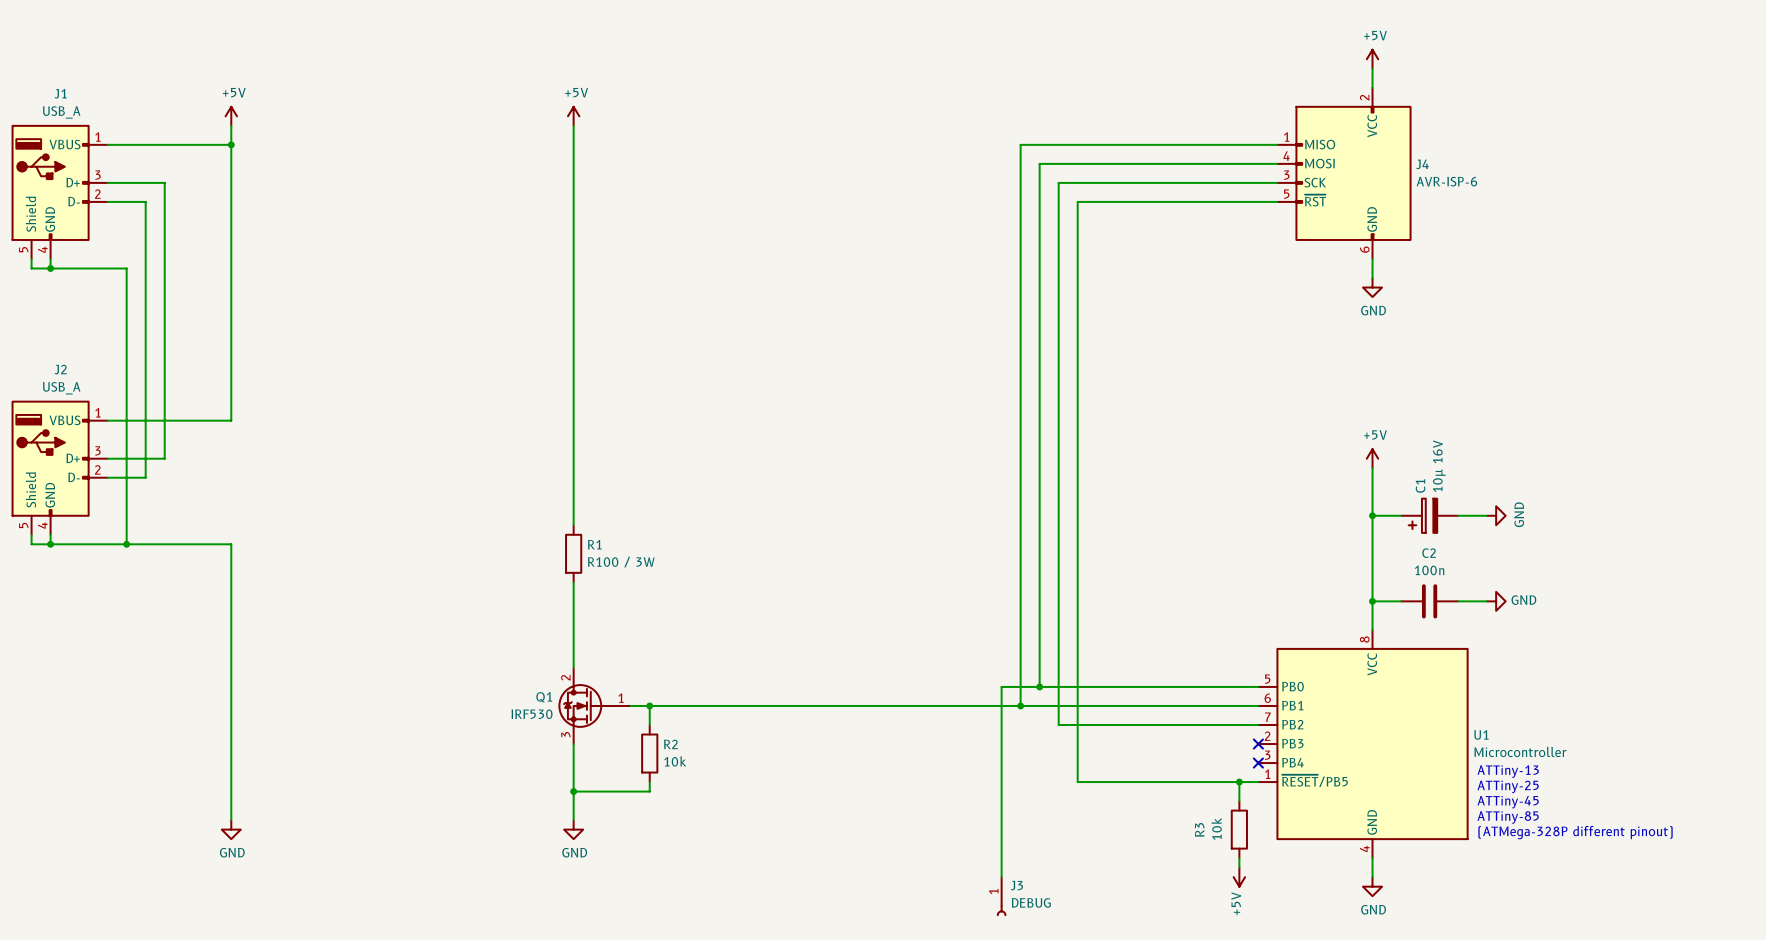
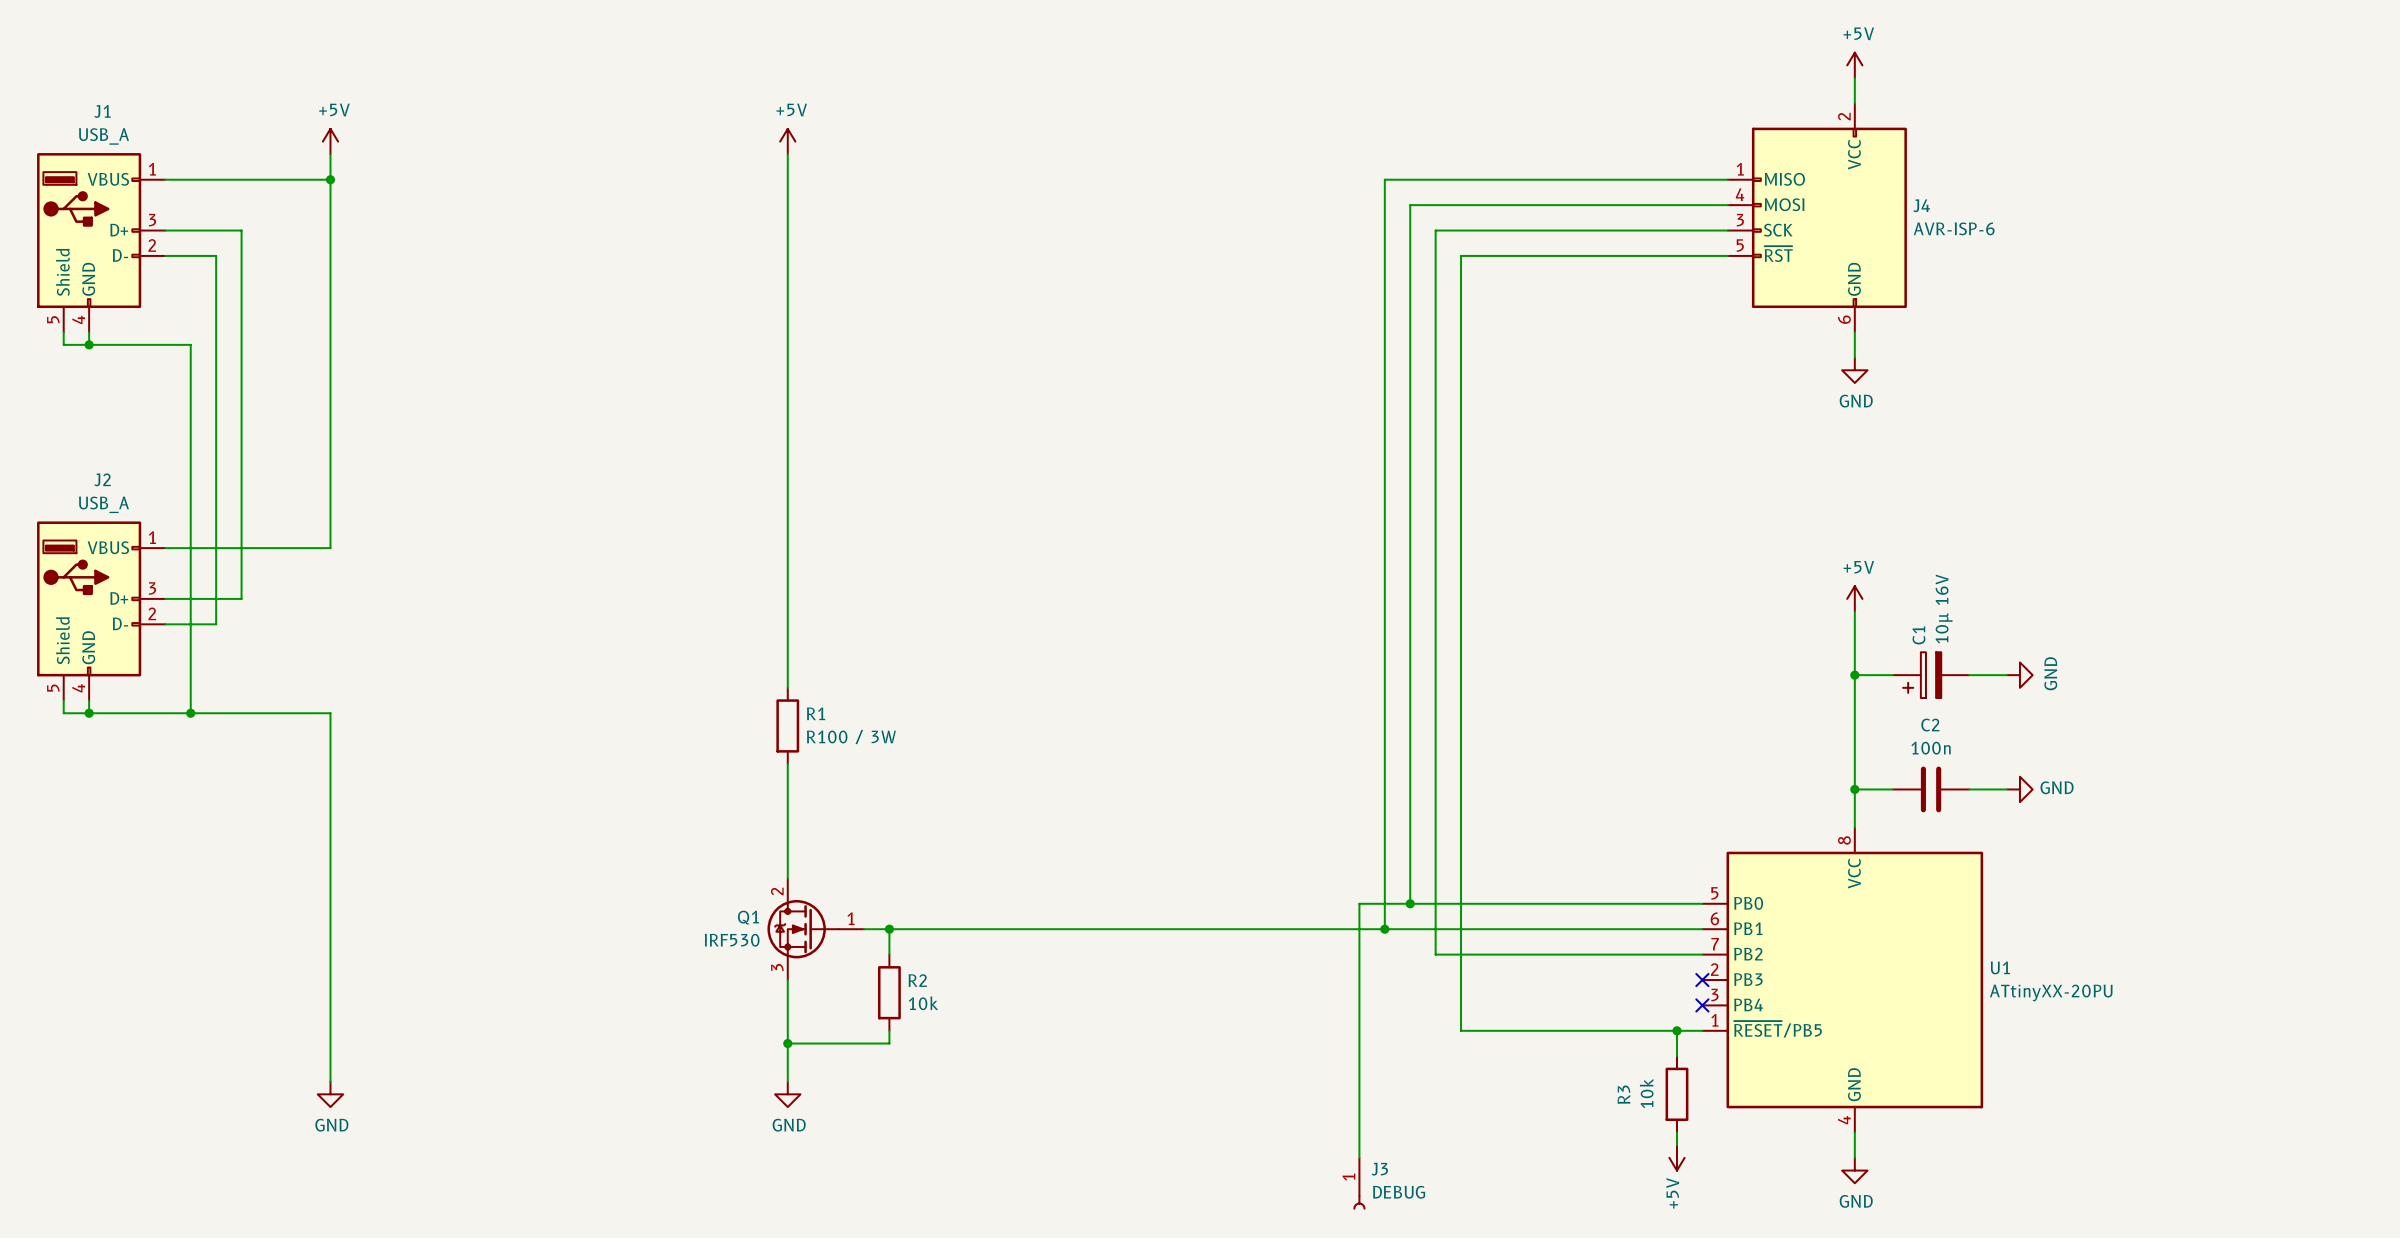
U1 value: Microcontroller (1520, 751) -> ATtinyXX-20PU (2051, 992)
text: ATTiny-13 (1508, 771) -> none
text: ATTiny-25 (1508, 786) -> none
text: ATTiny-45 (1508, 802) -> none
text: ATTiny-85 (1508, 817) -> none
text: (ATMega-328P different pinout) (1575, 832) -> none

